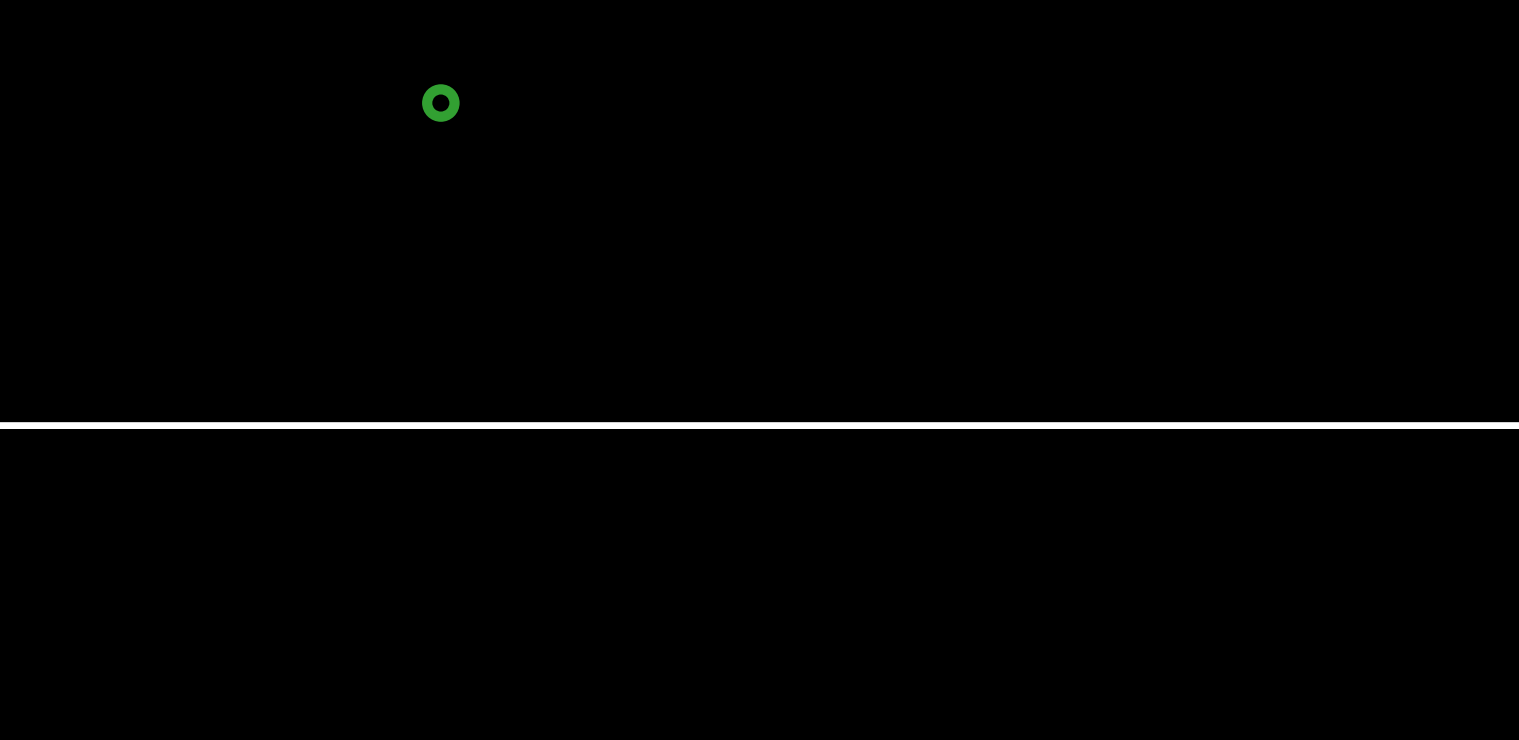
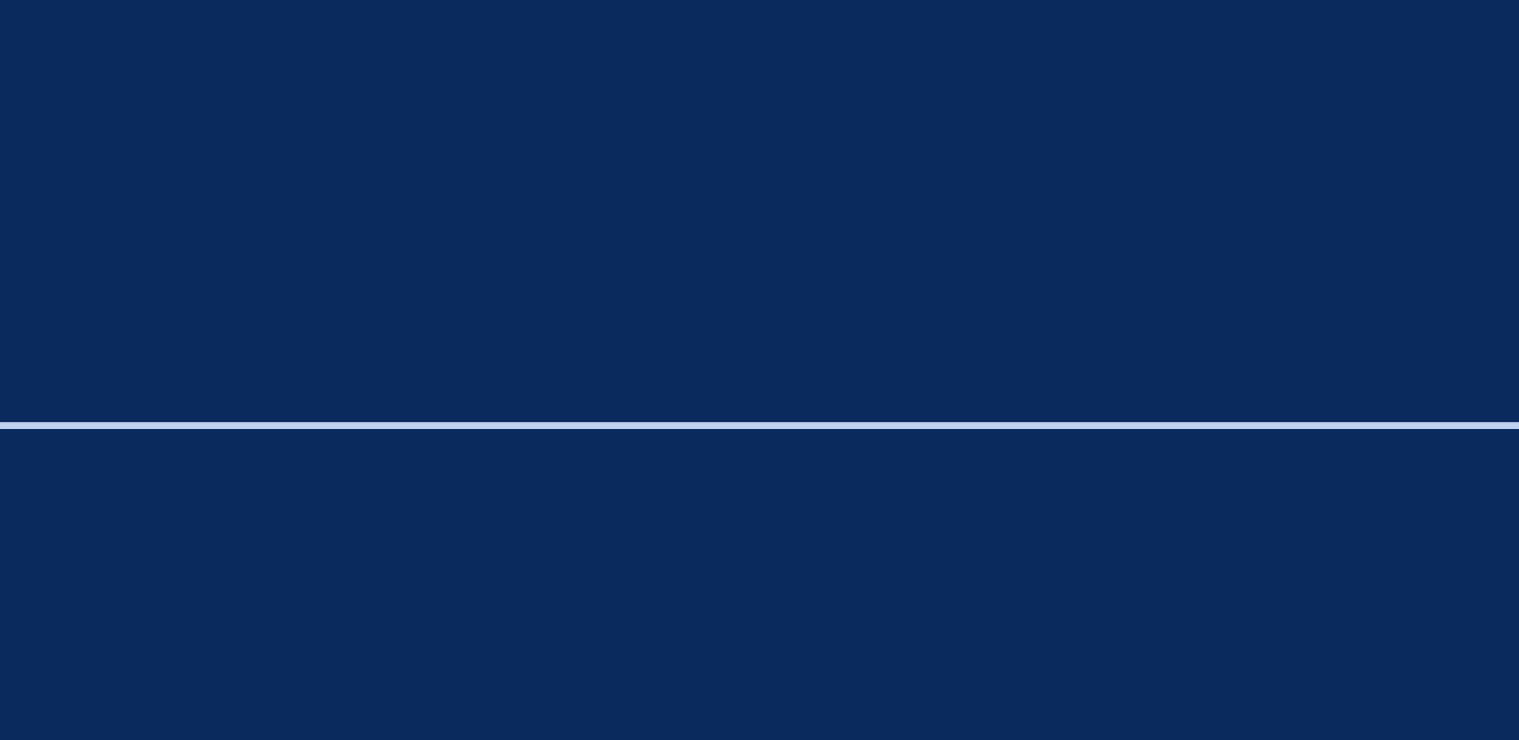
via: (440, 103) -> none

